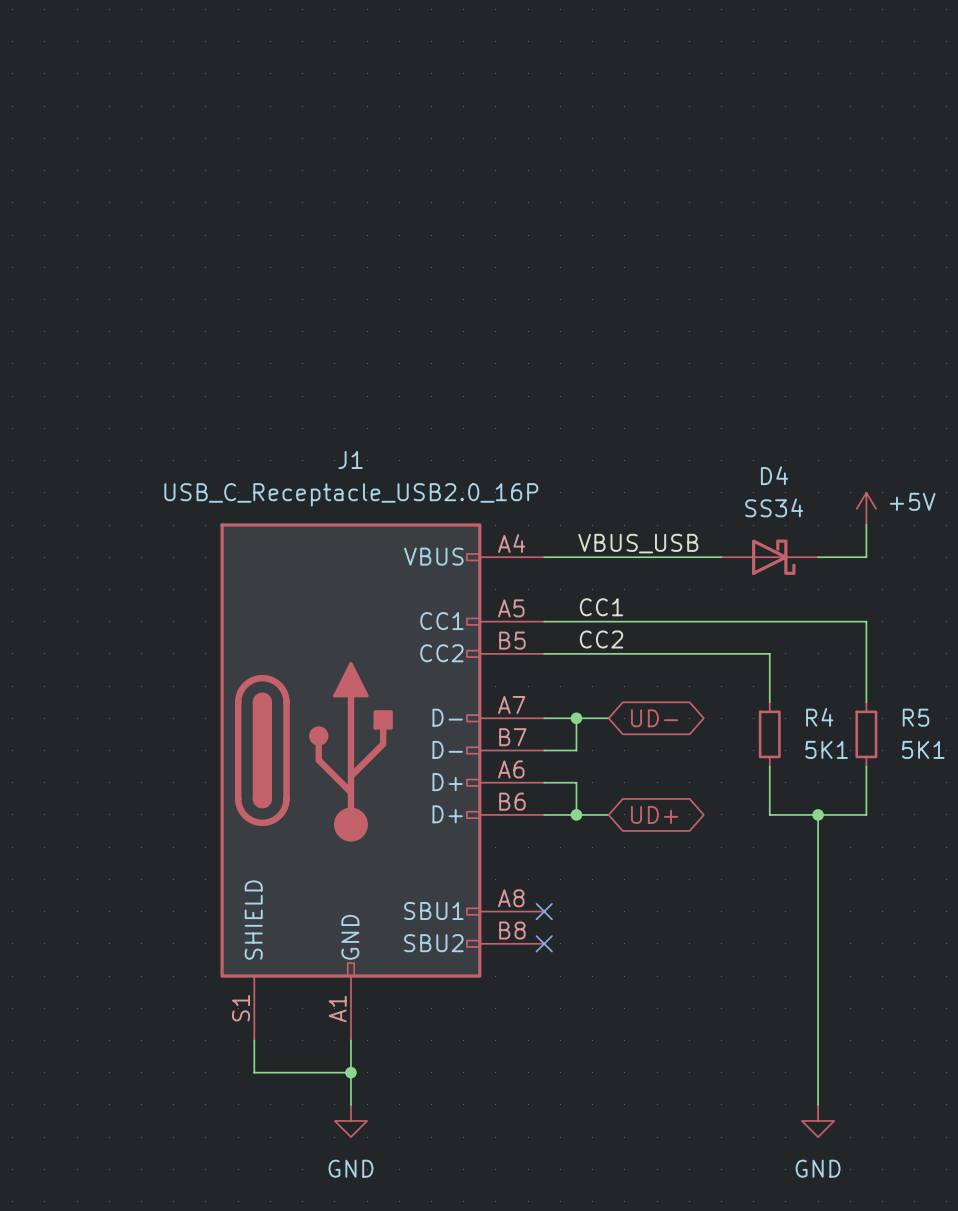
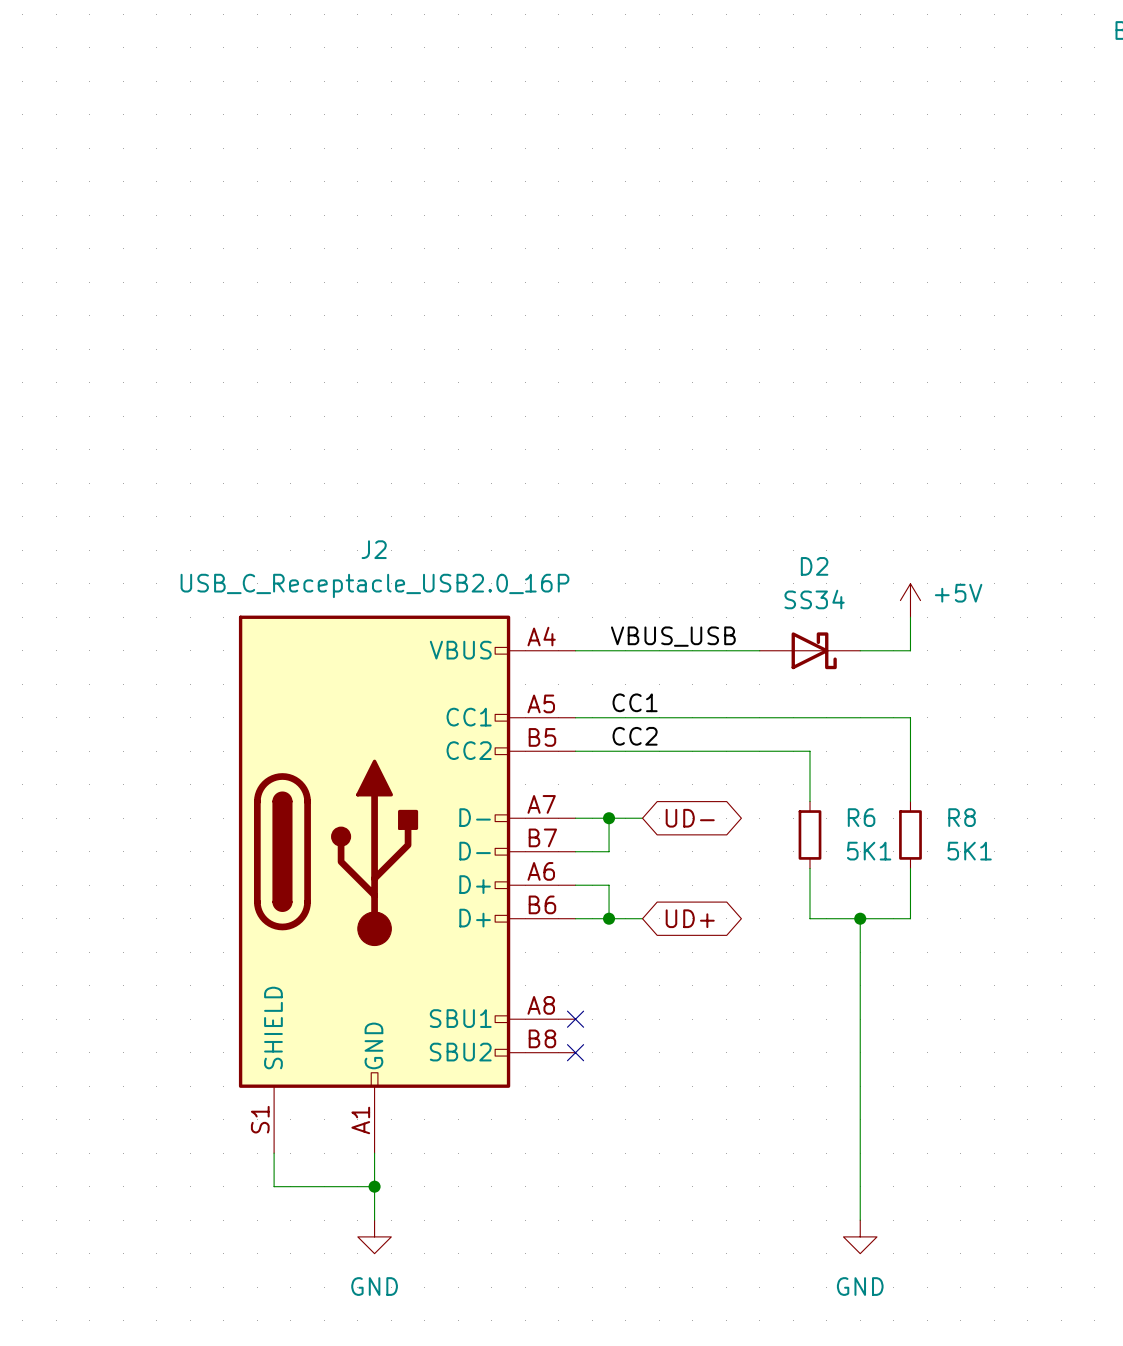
J1 name: J1 (350, 459) -> J2 (374, 549)
D4 name: D4 (774, 475) -> D2 (814, 566)
R4 name: R4 (819, 717) -> R6 (861, 817)
R5 name: R5 (915, 717) -> R8 (962, 817)

